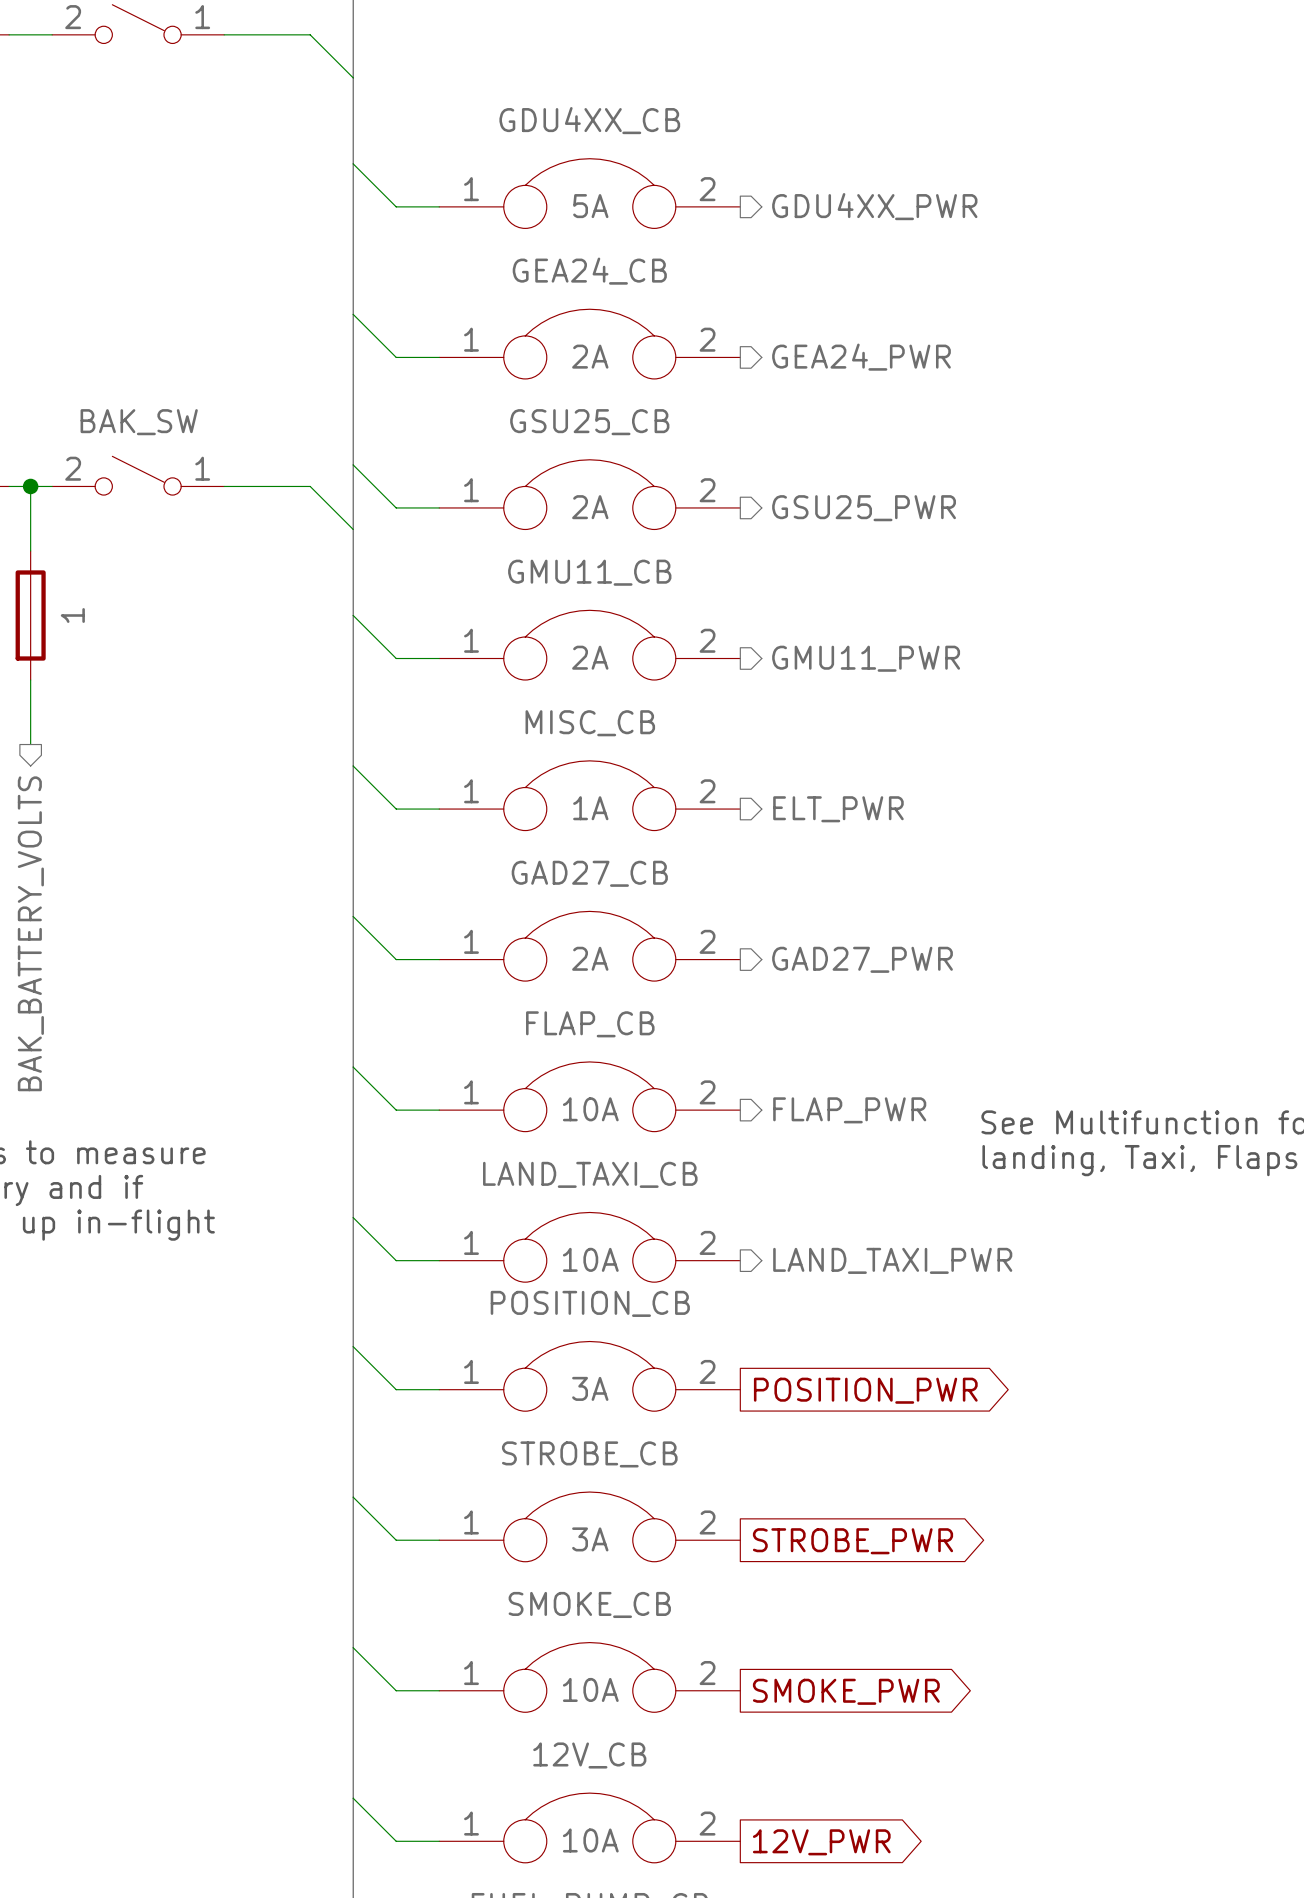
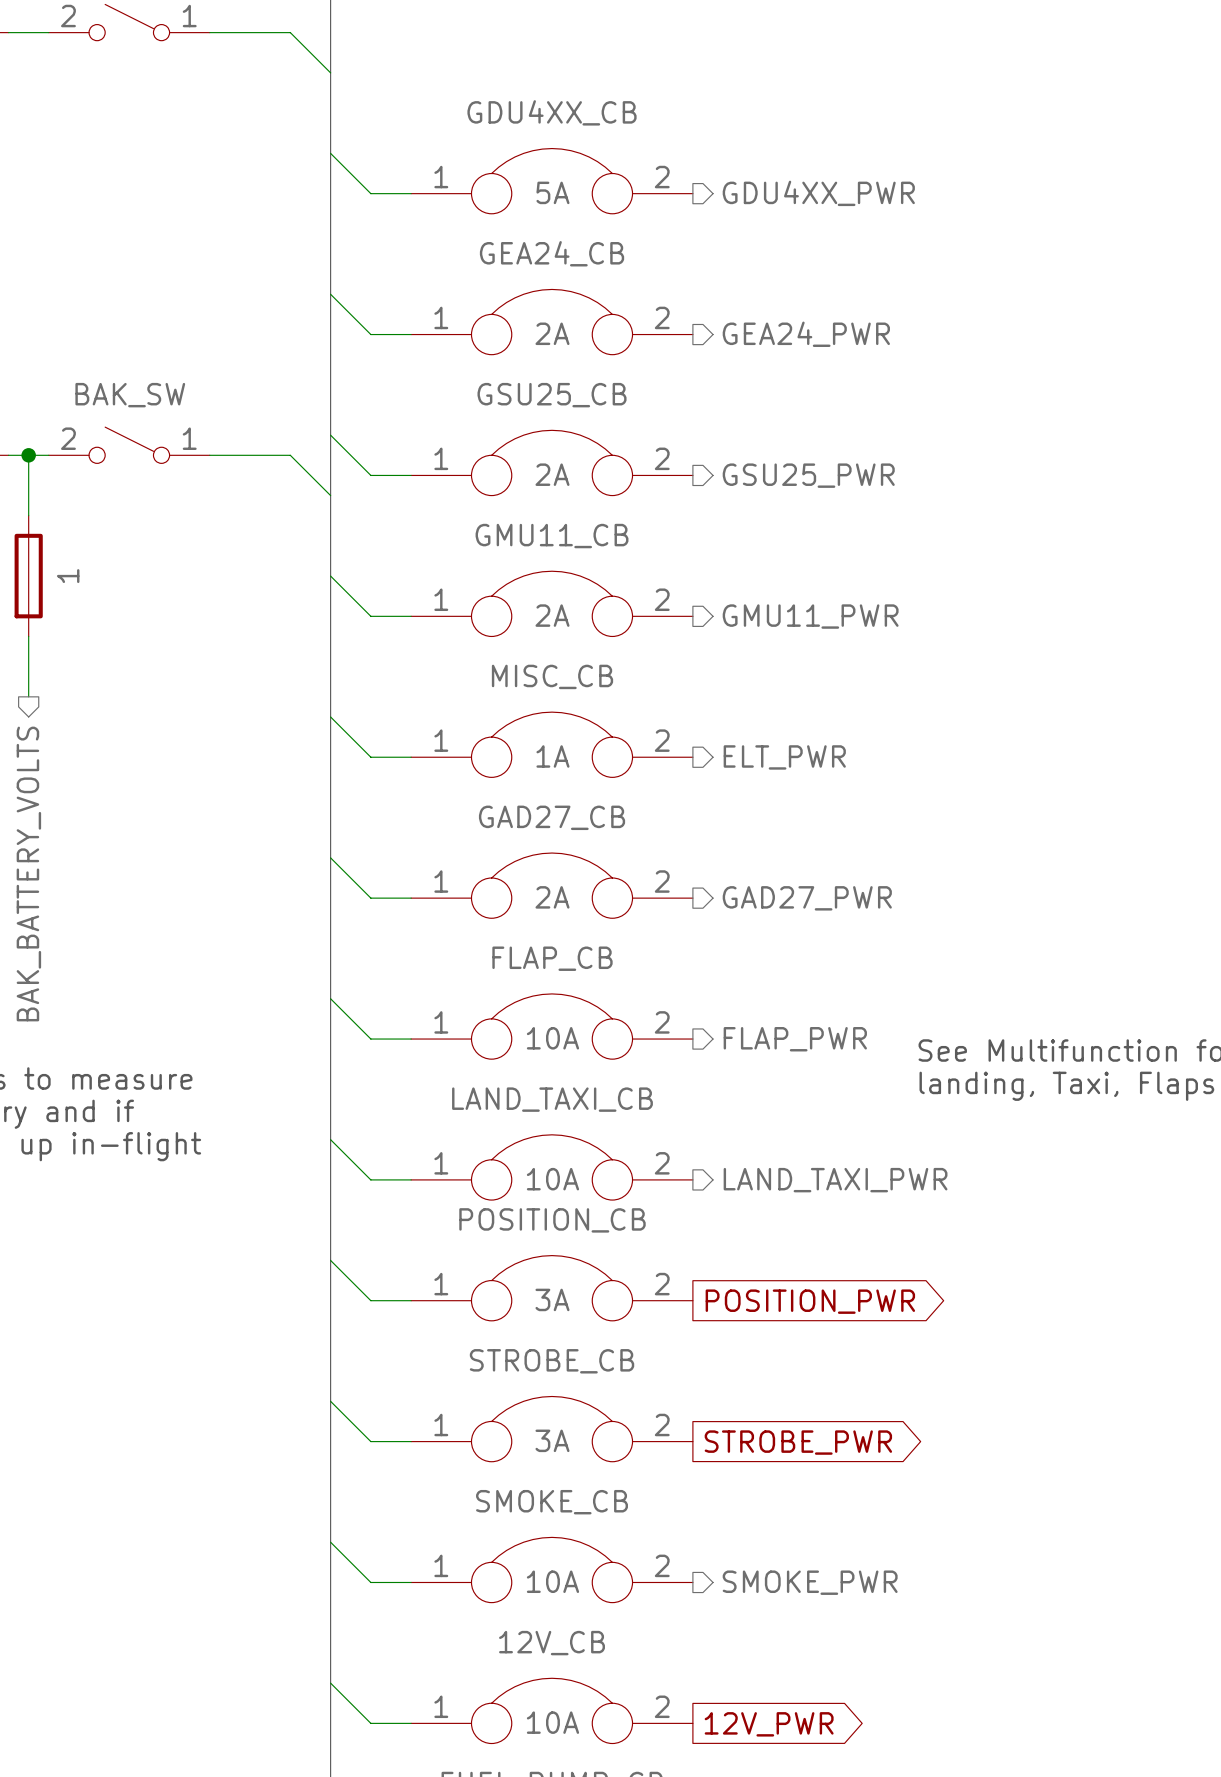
hierarchical label: none -> SMOKE_PWR (810, 1582)
global label: SMOKE_PWR (846, 1691) -> none

